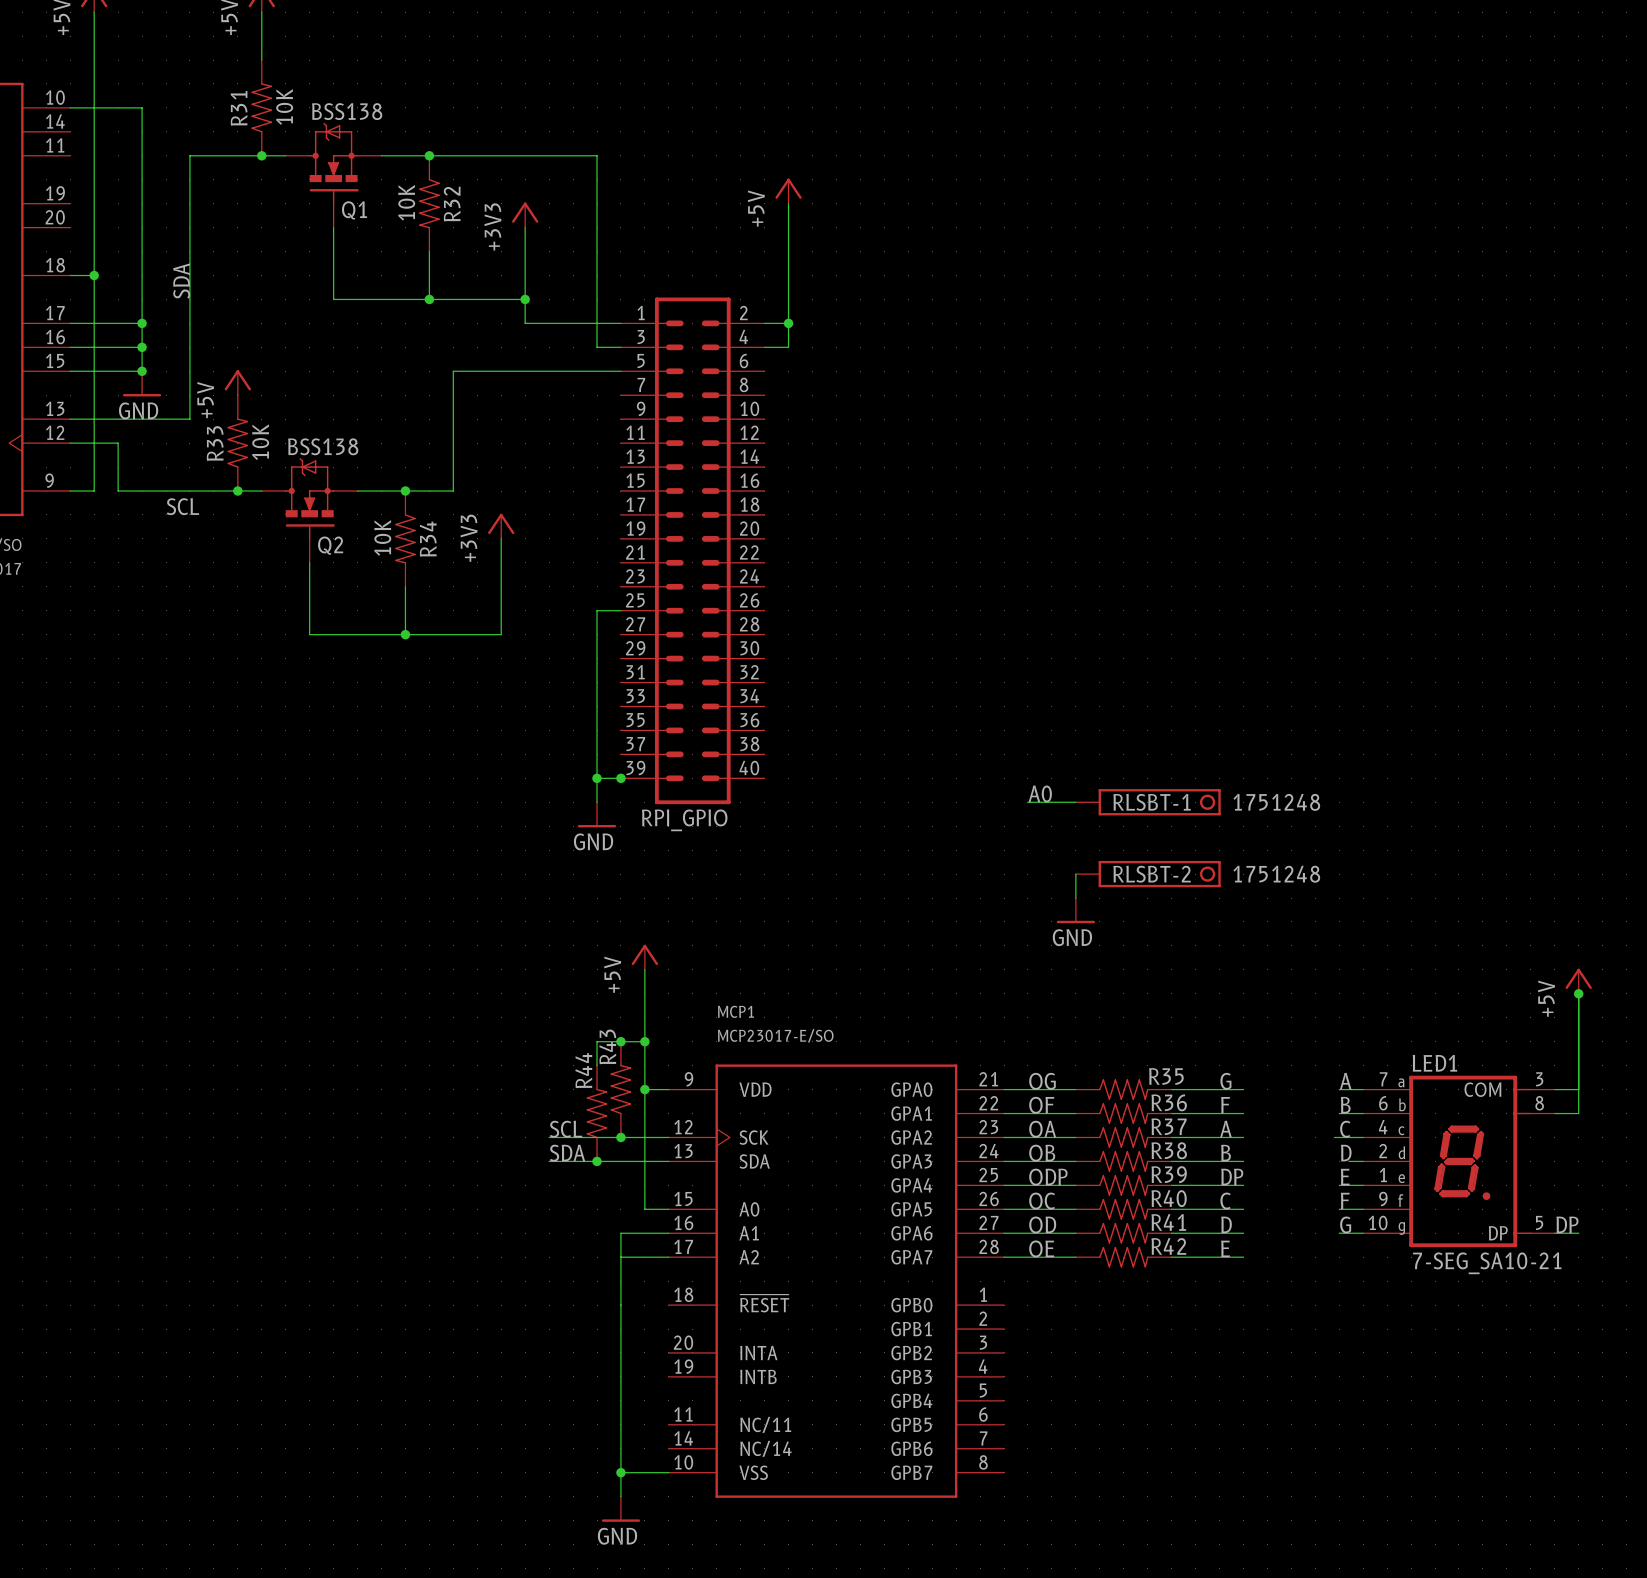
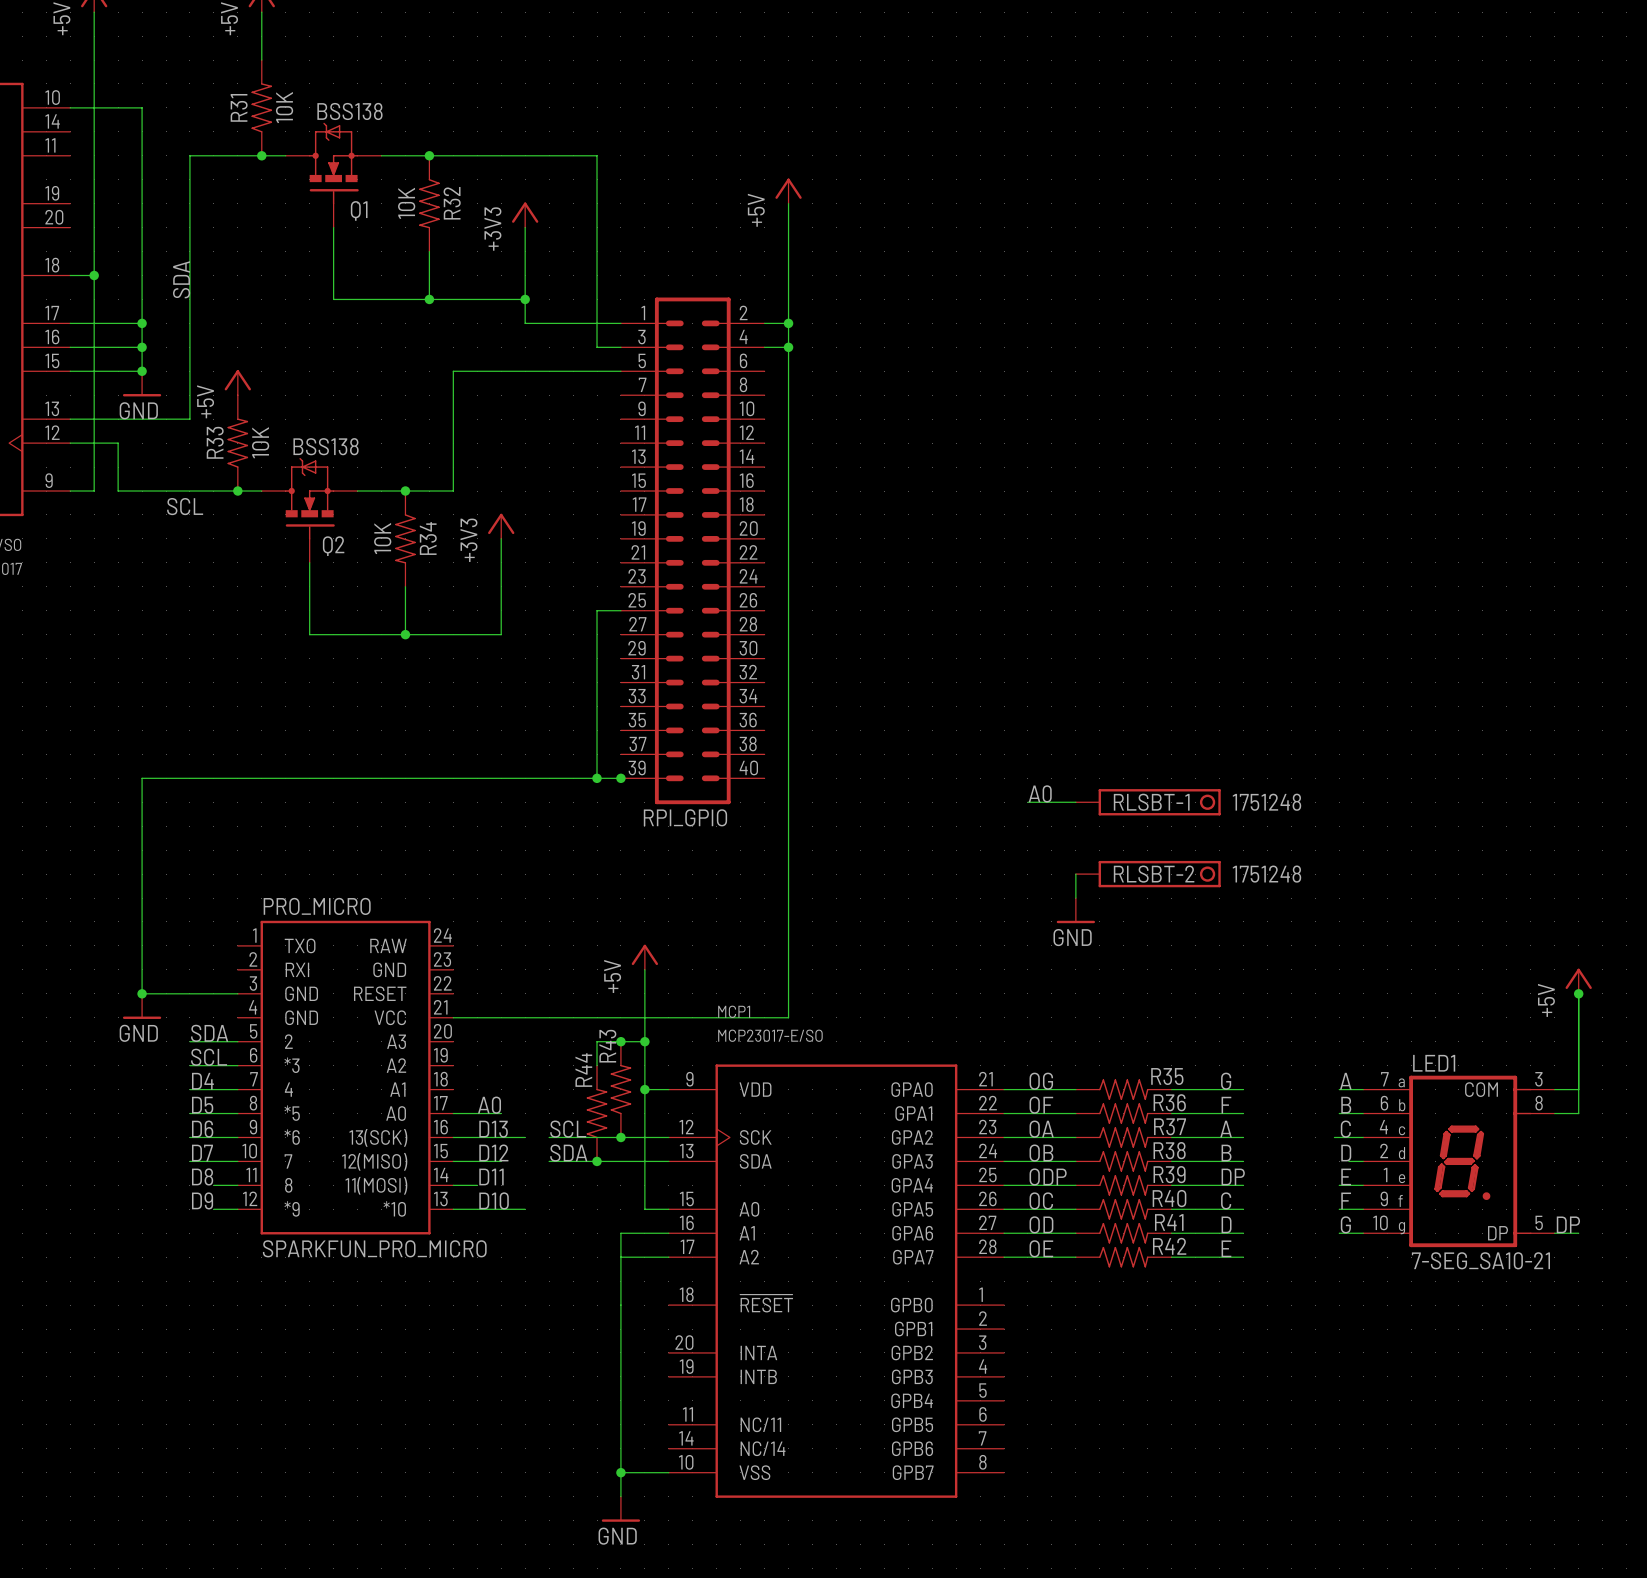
wire: none -> (788, 347) (788, 1017) (453, 1017)
junction: none -> (788, 347)
wire: (597, 778) (597, 802) -> (597, 778) (142, 778) (142, 993) (237, 993)
power symbol: GND (597, 814) -> none
junction: none -> (142, 993)
power symbol: none -> GND (142, 1006)
label: none -> SDA (209, 1033)
wire: none -> (189, 1041) (237, 1041)
label: none -> SCL (209, 1057)
wire: none -> (189, 1065) (237, 1065)
PRO_MICRO: none -> SPARKFUN_PRO_MICRO (345, 1077)
label: none -> D4 (202, 1081)
wire: none -> (189, 1089) (237, 1089)
label: none -> D5 (202, 1105)
label: none -> A0 (489, 1105)
wire: none -> (189, 1113) (237, 1113)
wire: none -> (453, 1113) (501, 1113)
label: none -> D6 (202, 1129)
label: none -> D13 (493, 1129)
wire: none -> (189, 1137) (237, 1137)
wire: none -> (453, 1137) (525, 1137)
label: none -> D7 (202, 1153)
label: none -> D12 (493, 1152)
wire: none -> (189, 1161) (237, 1161)
wire: none -> (453, 1161) (501, 1161)
label: none -> D11 (491, 1176)
label: none -> D8 (202, 1176)
wire: none -> (213, 1185) (237, 1185)
wire: none -> (453, 1185) (477, 1185)
label: none -> D9 (202, 1200)
label: none -> D10 (494, 1200)
wire: none -> (213, 1209) (237, 1209)
wire: none -> (453, 1209) (525, 1209)

